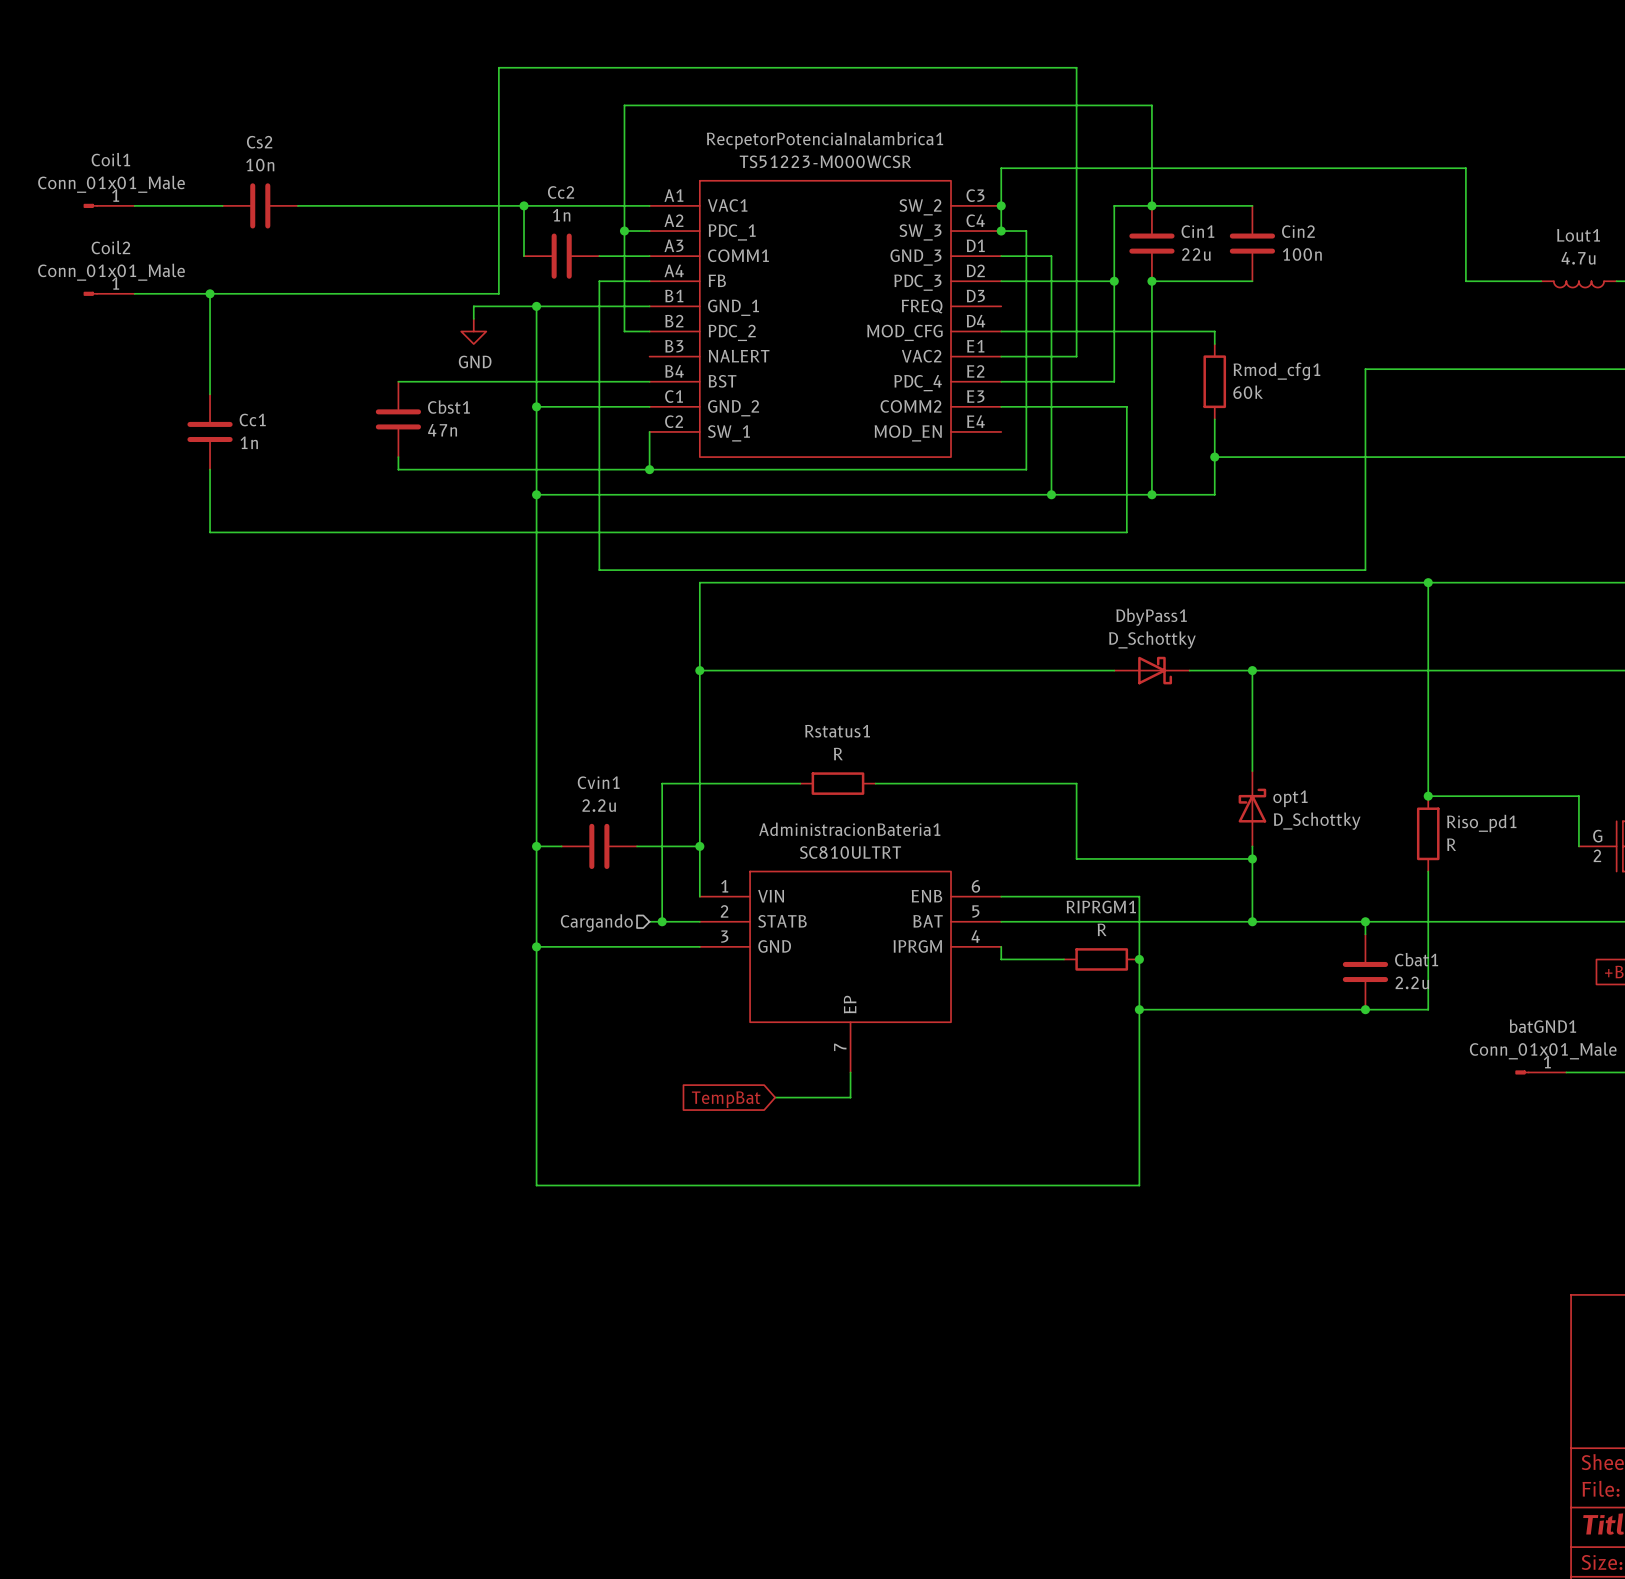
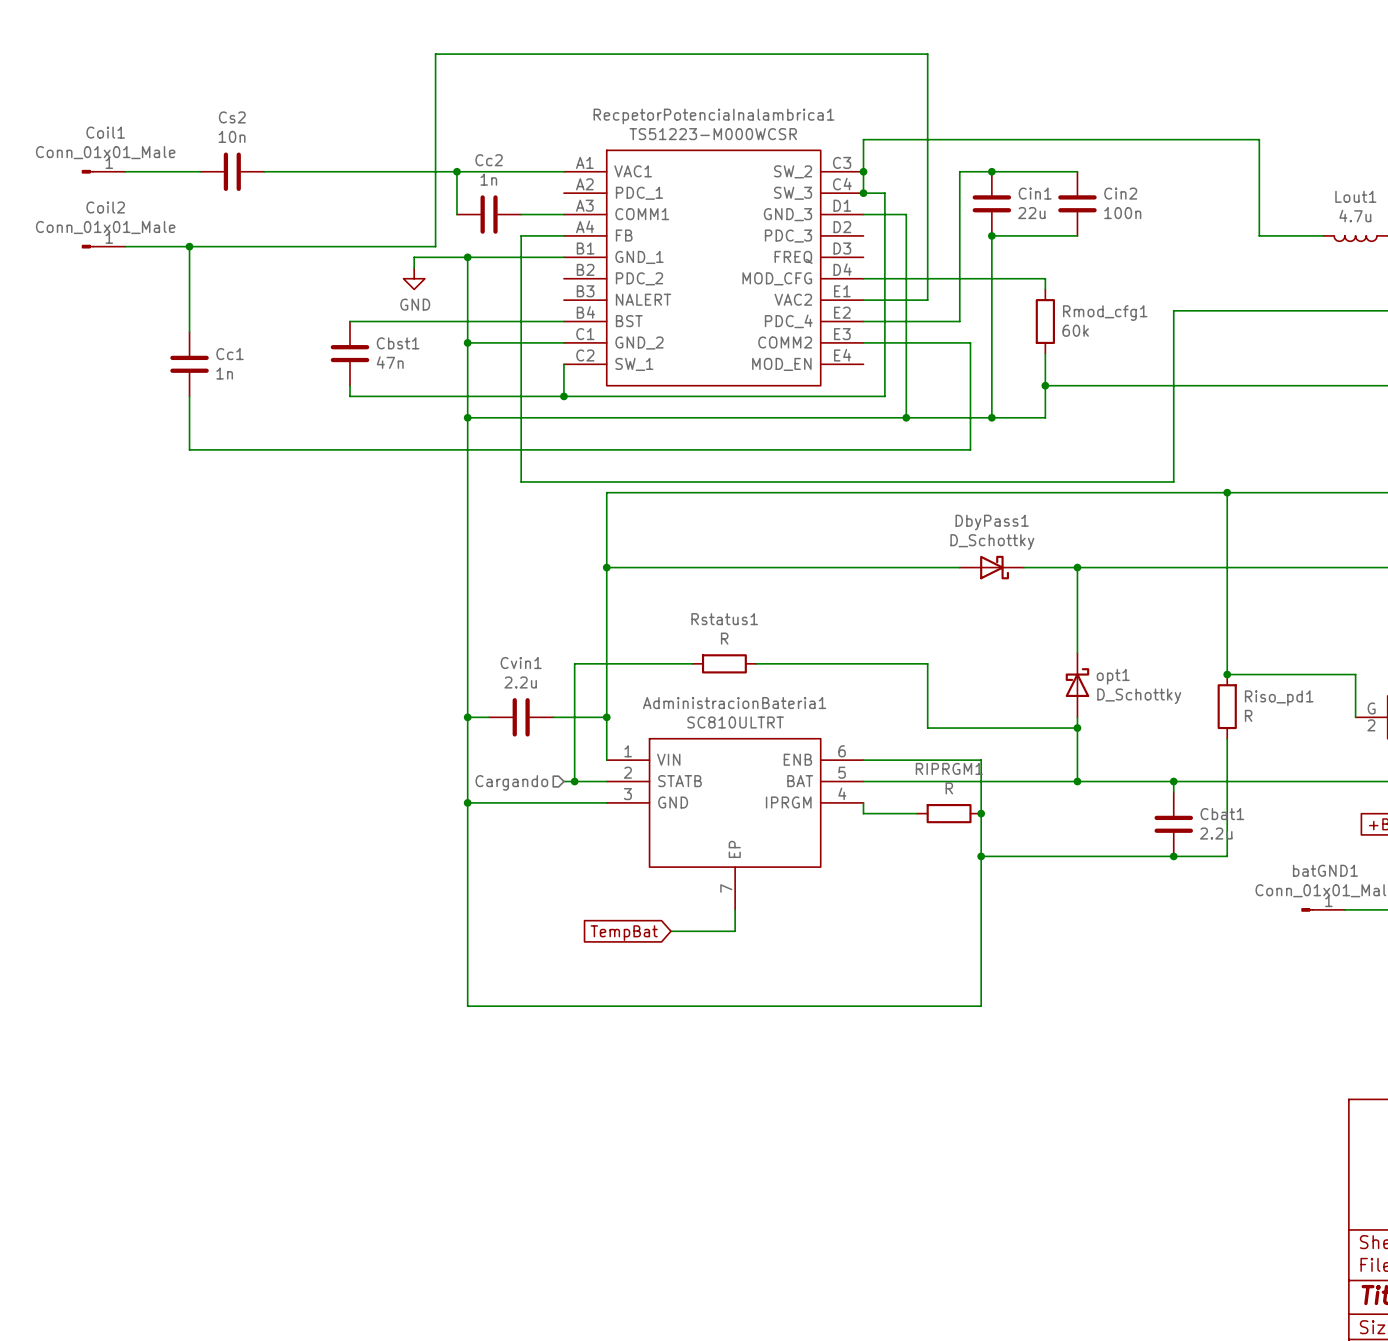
wire: (1151, 205) (1151, 105) (624, 105) (624, 331) (649, 331) -> none
wire: (624, 231) (649, 231) -> none
junction: (624, 231) -> none
wire: (1001, 281) (1114, 281) -> none
junction: (1114, 281) -> none

